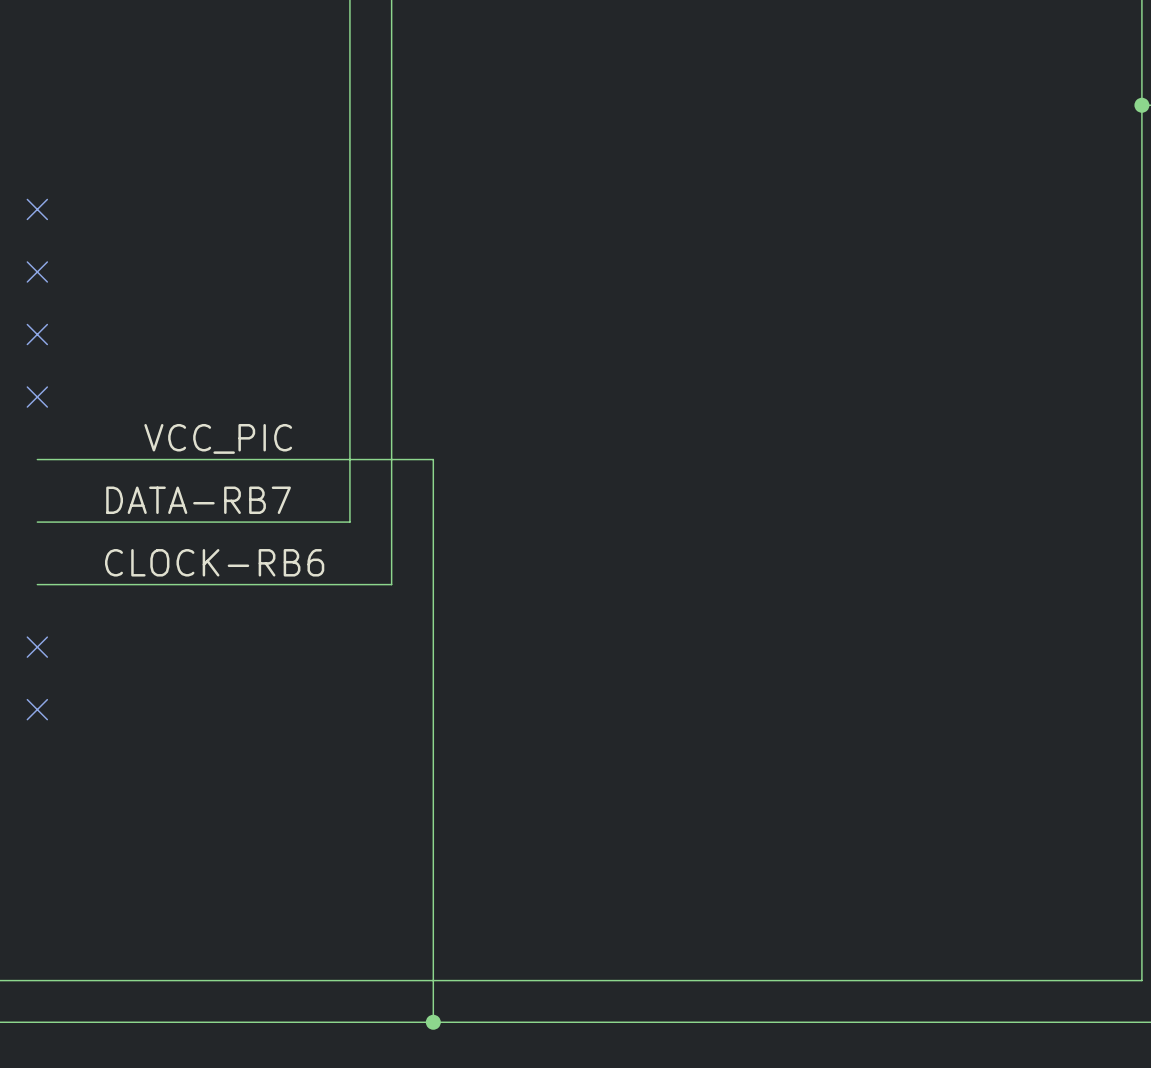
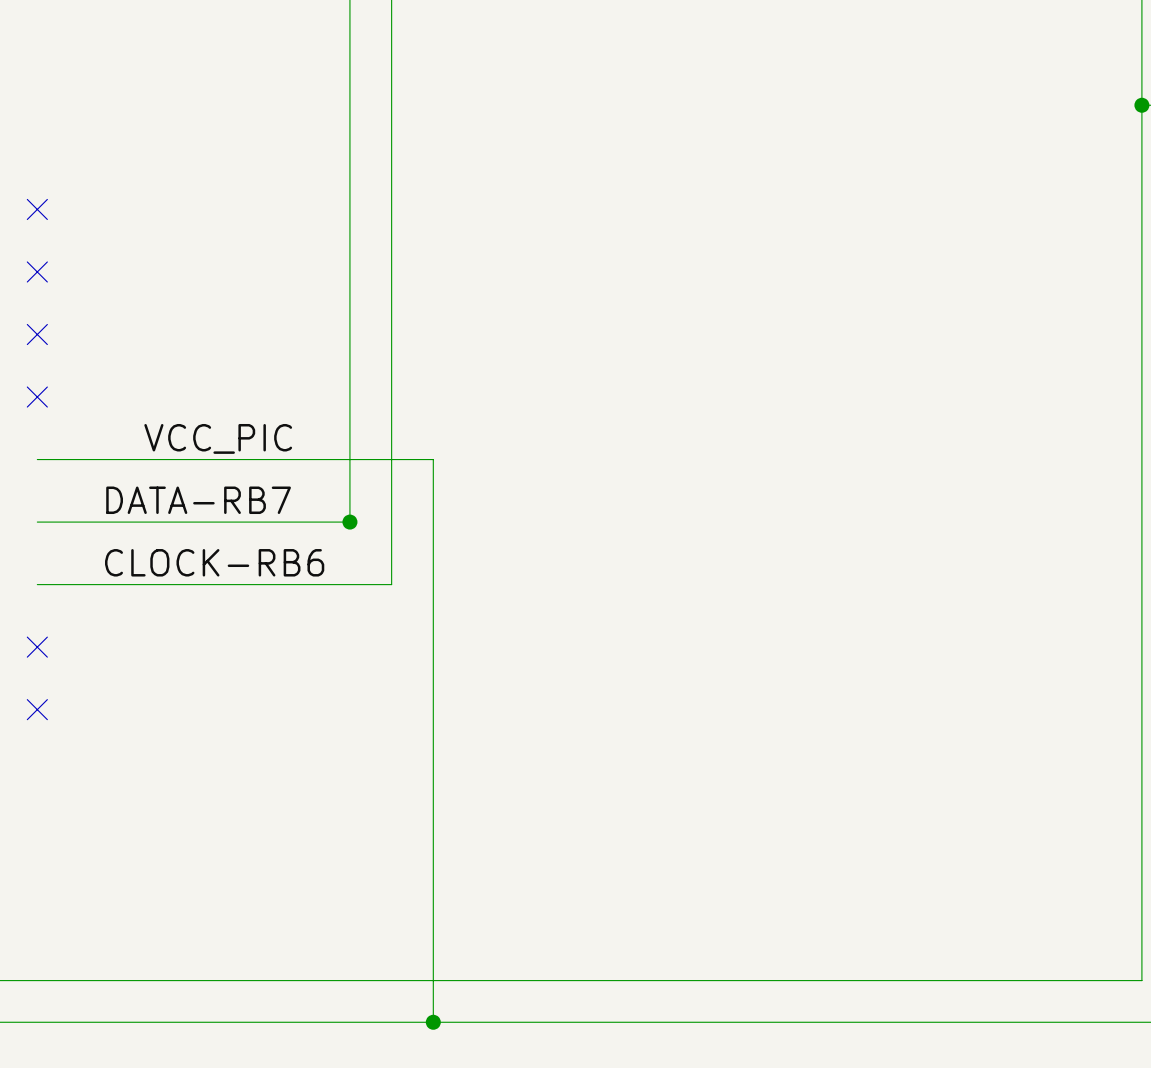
junction: none -> (349, 522)

